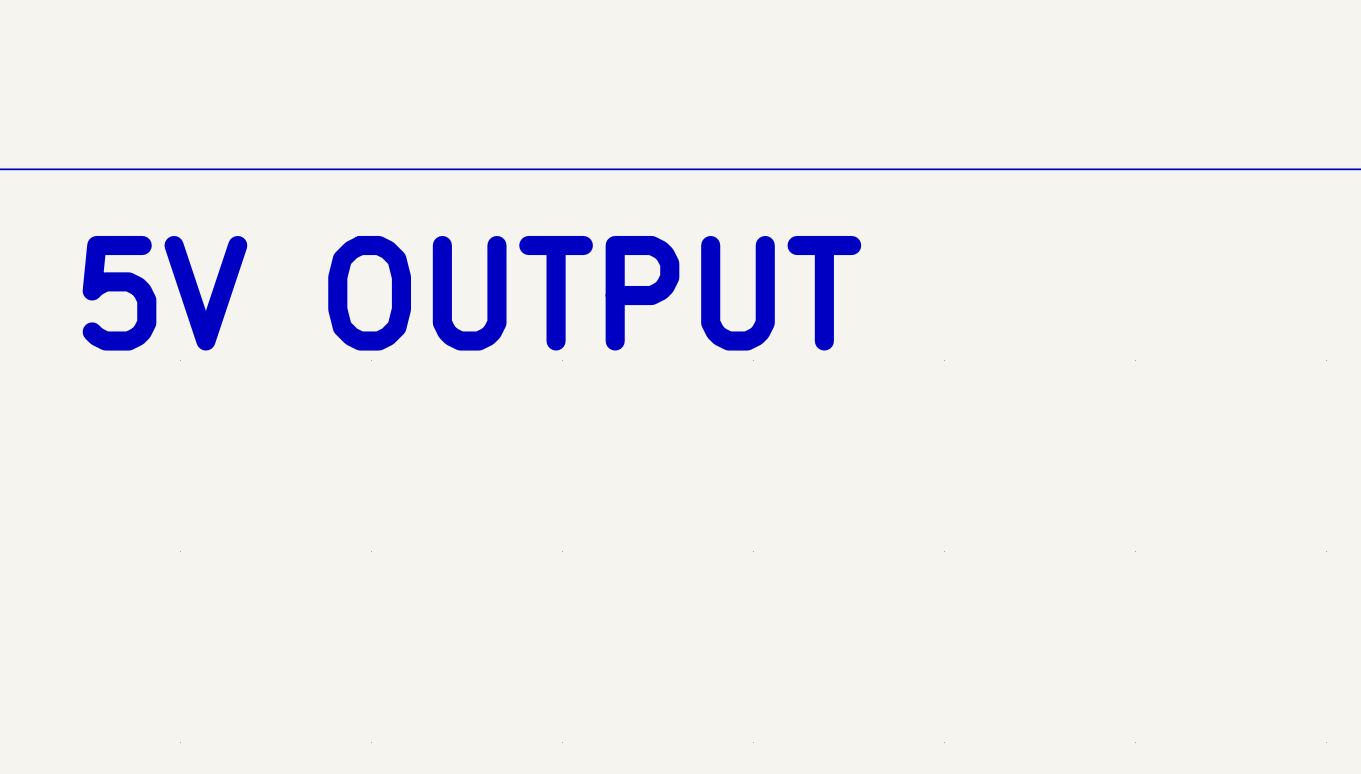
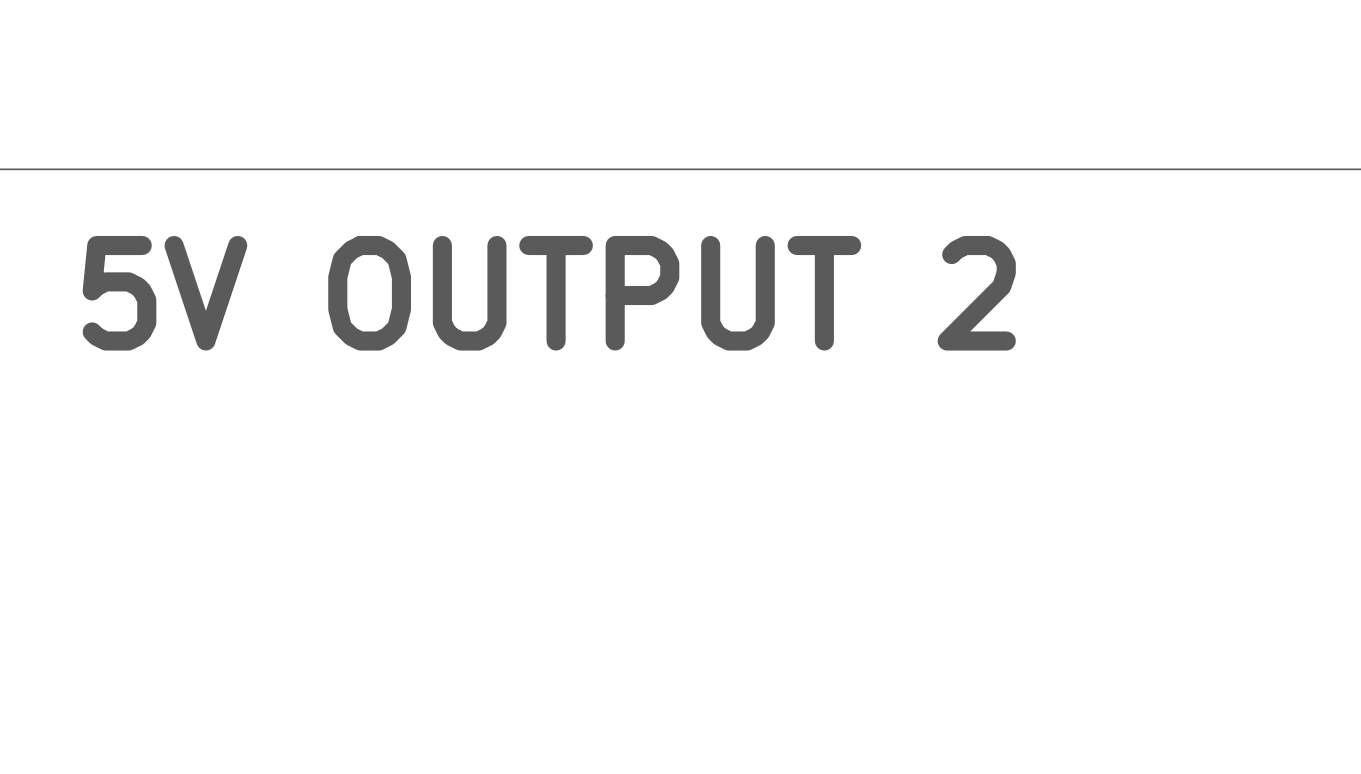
text: 5V OUTPUT (471, 293) -> 5V OUTPUT 2 (549, 293)

